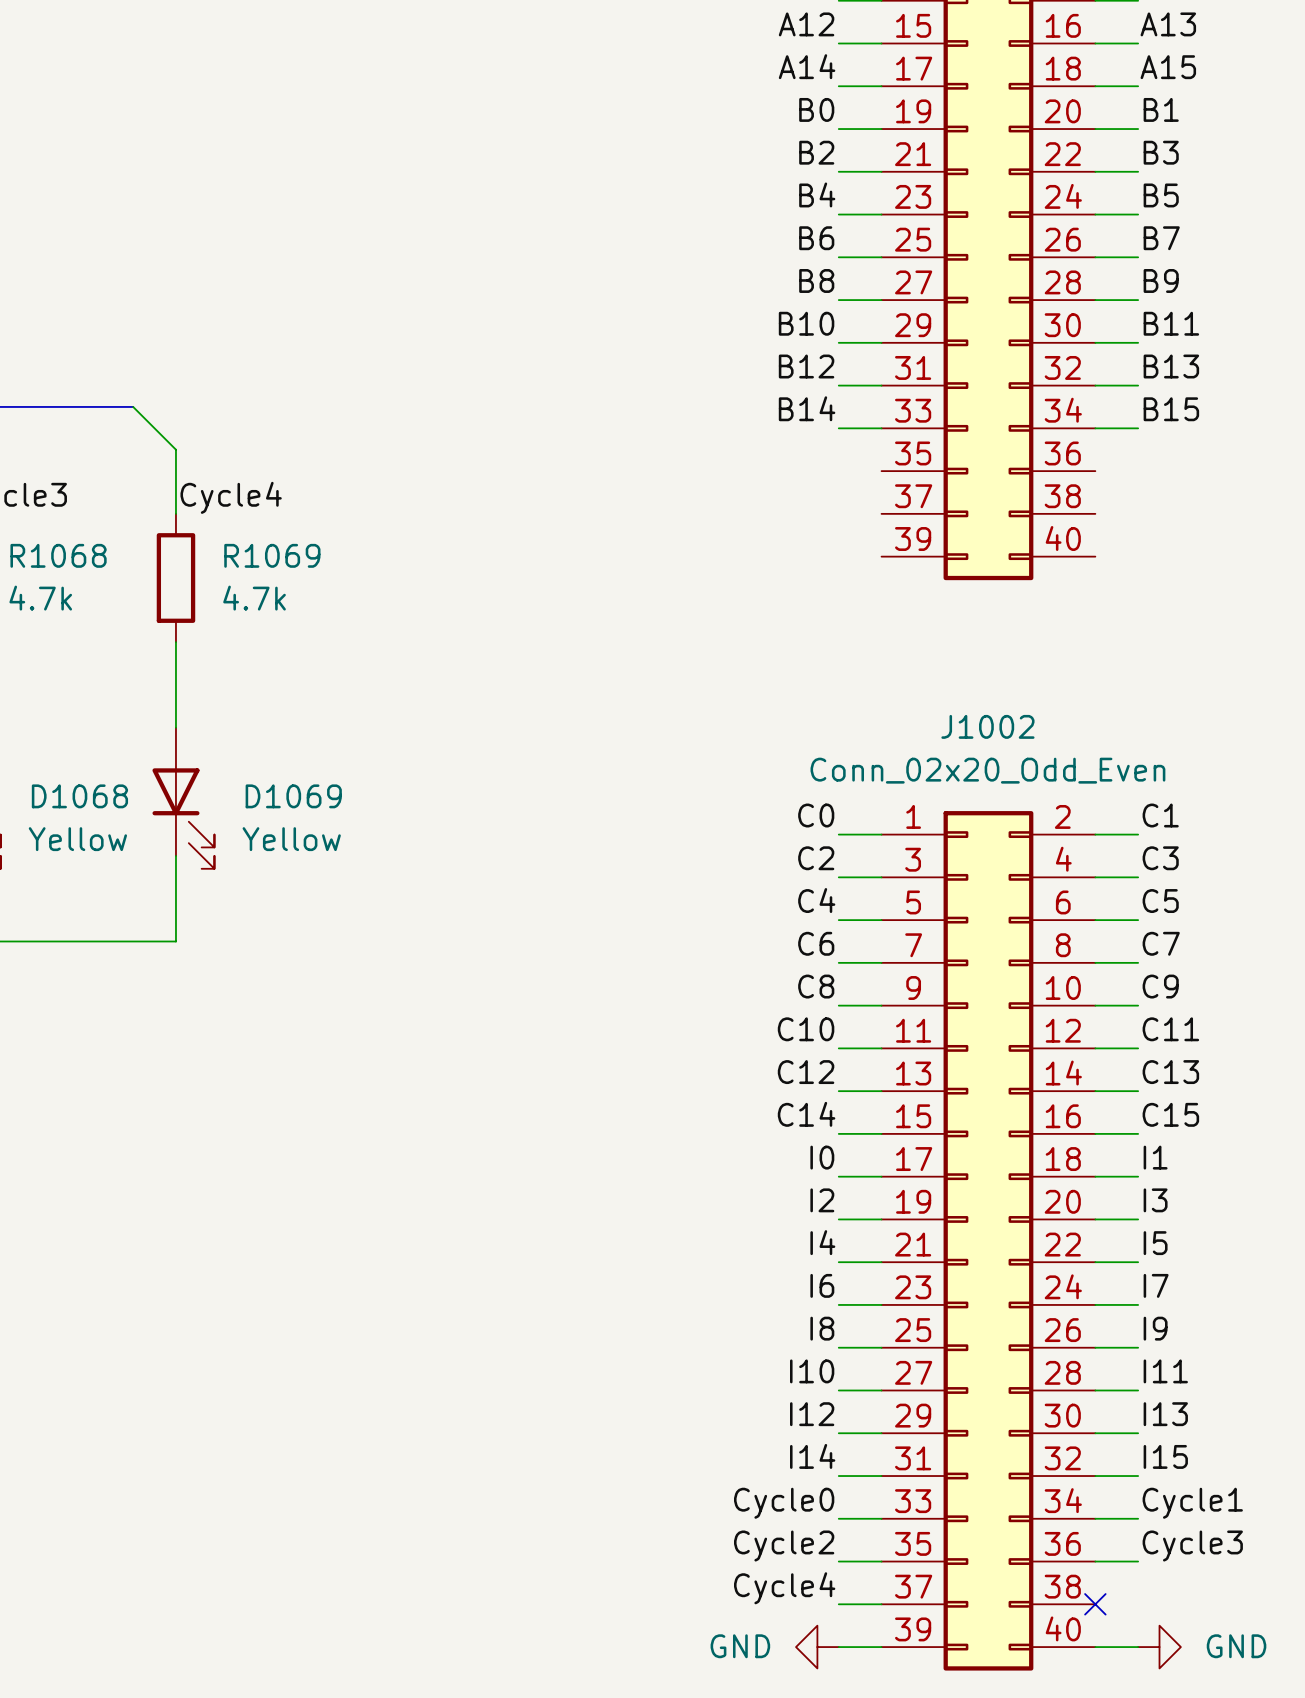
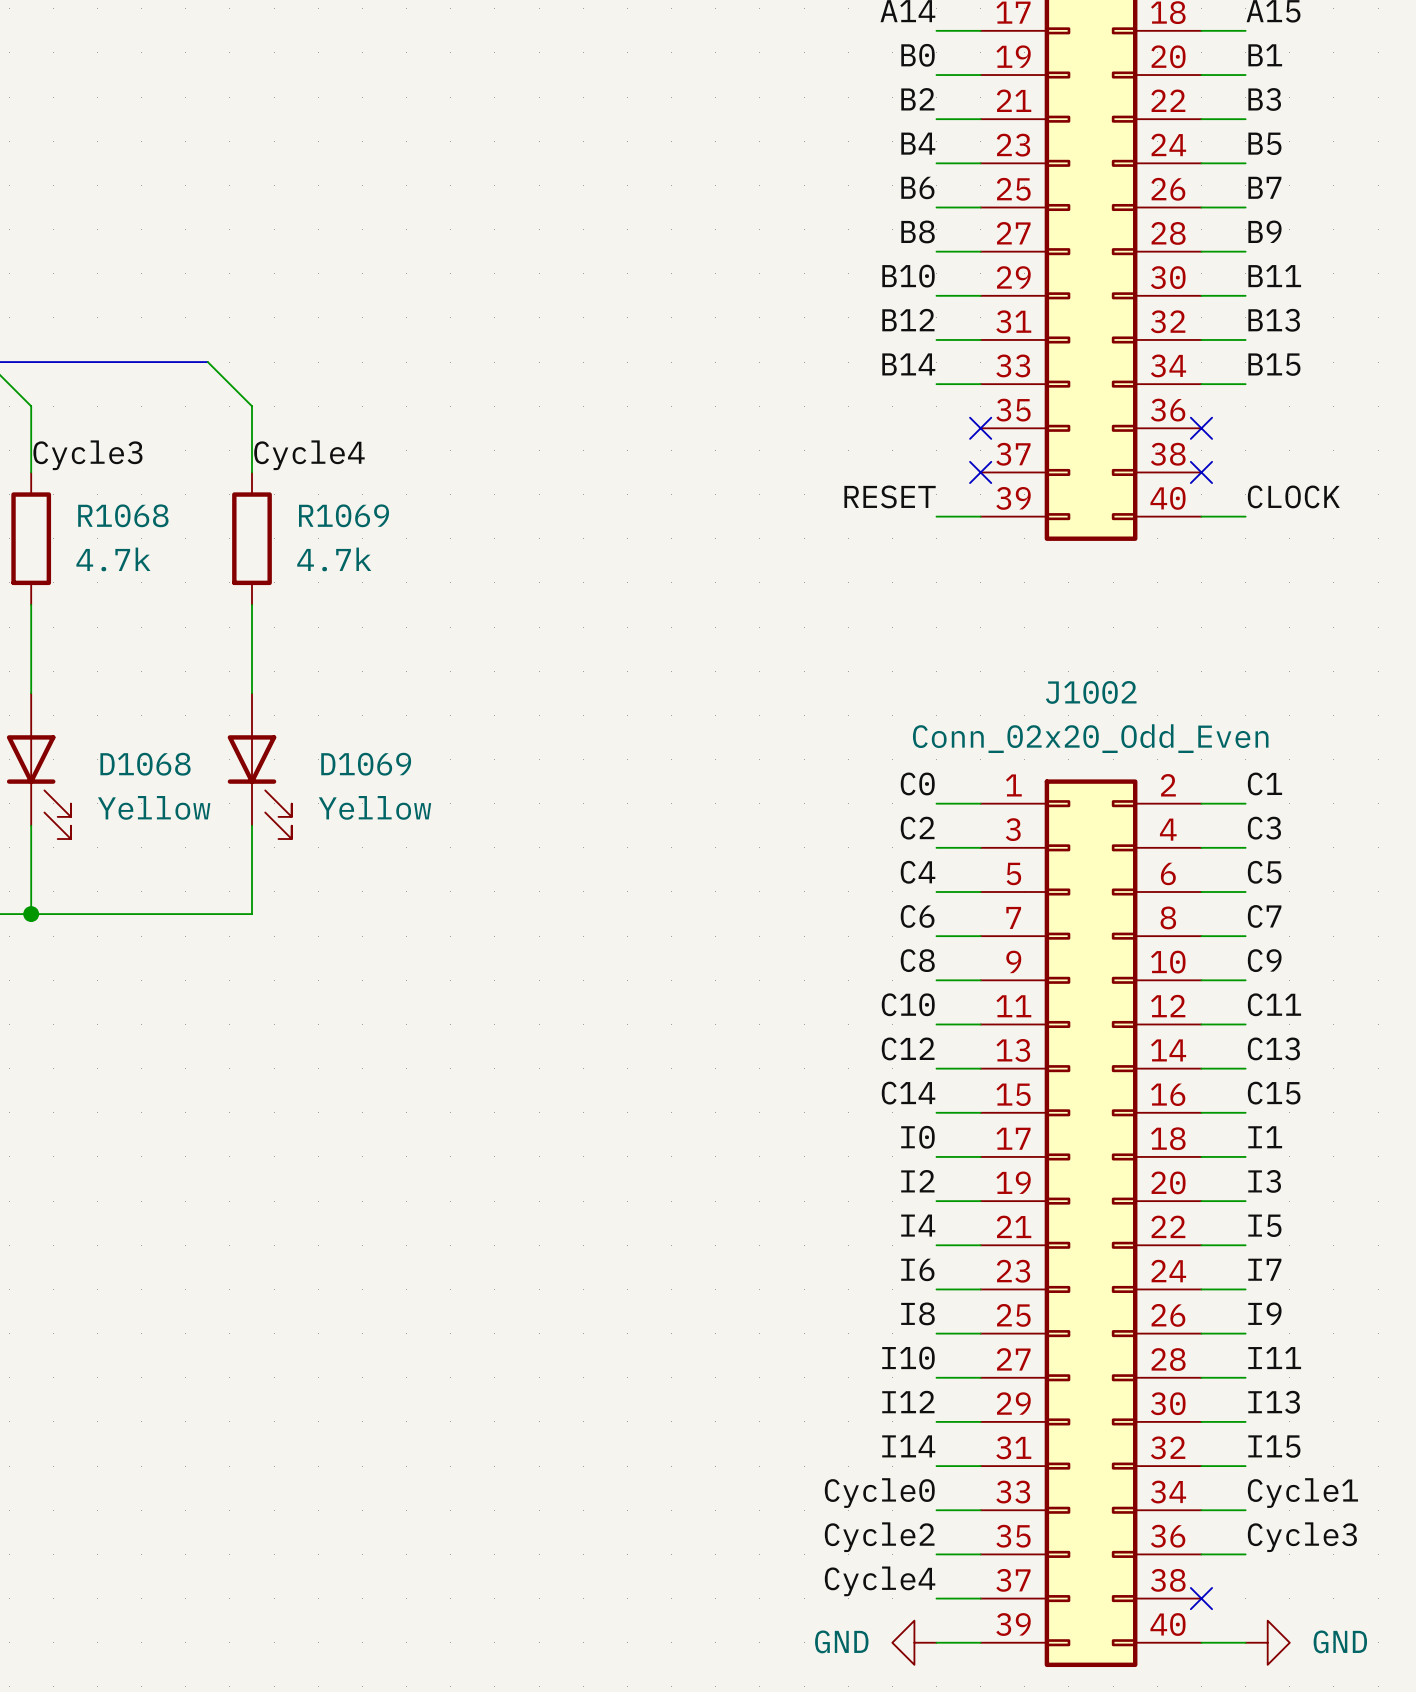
no-connect mark: none -> (980, 428)
no-connect mark: none -> (1201, 428)
no-connect mark: none -> (980, 472)
no-connect mark: none -> (1201, 472)
label: none -> RESET (890, 496)
label: none -> CLOCK (1293, 496)
wire: none -> (936, 516) (980, 516)
wire: none -> (1201, 516) (1245, 516)

